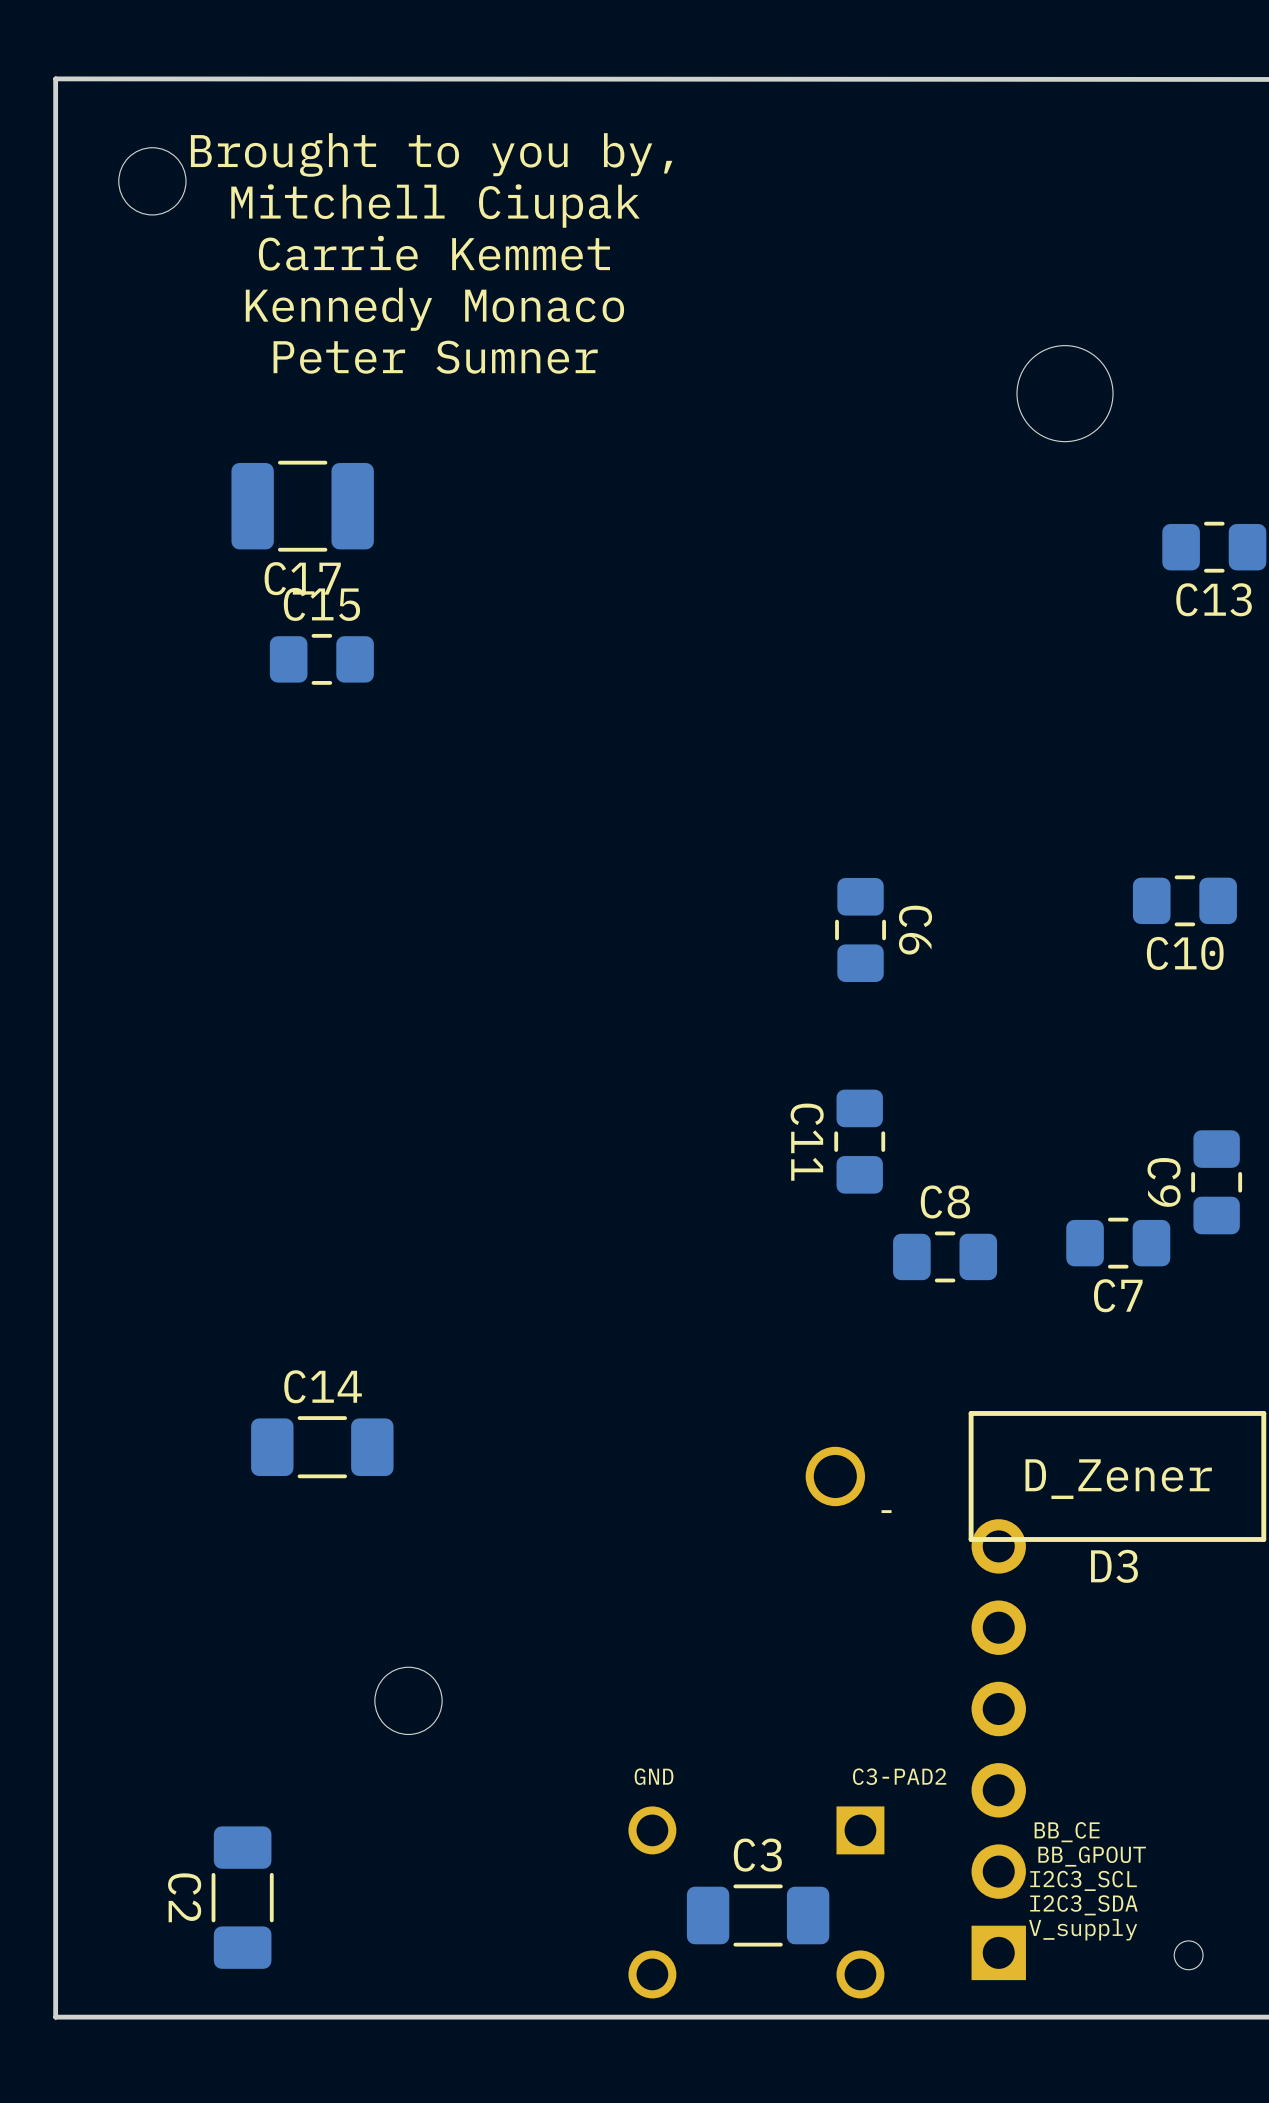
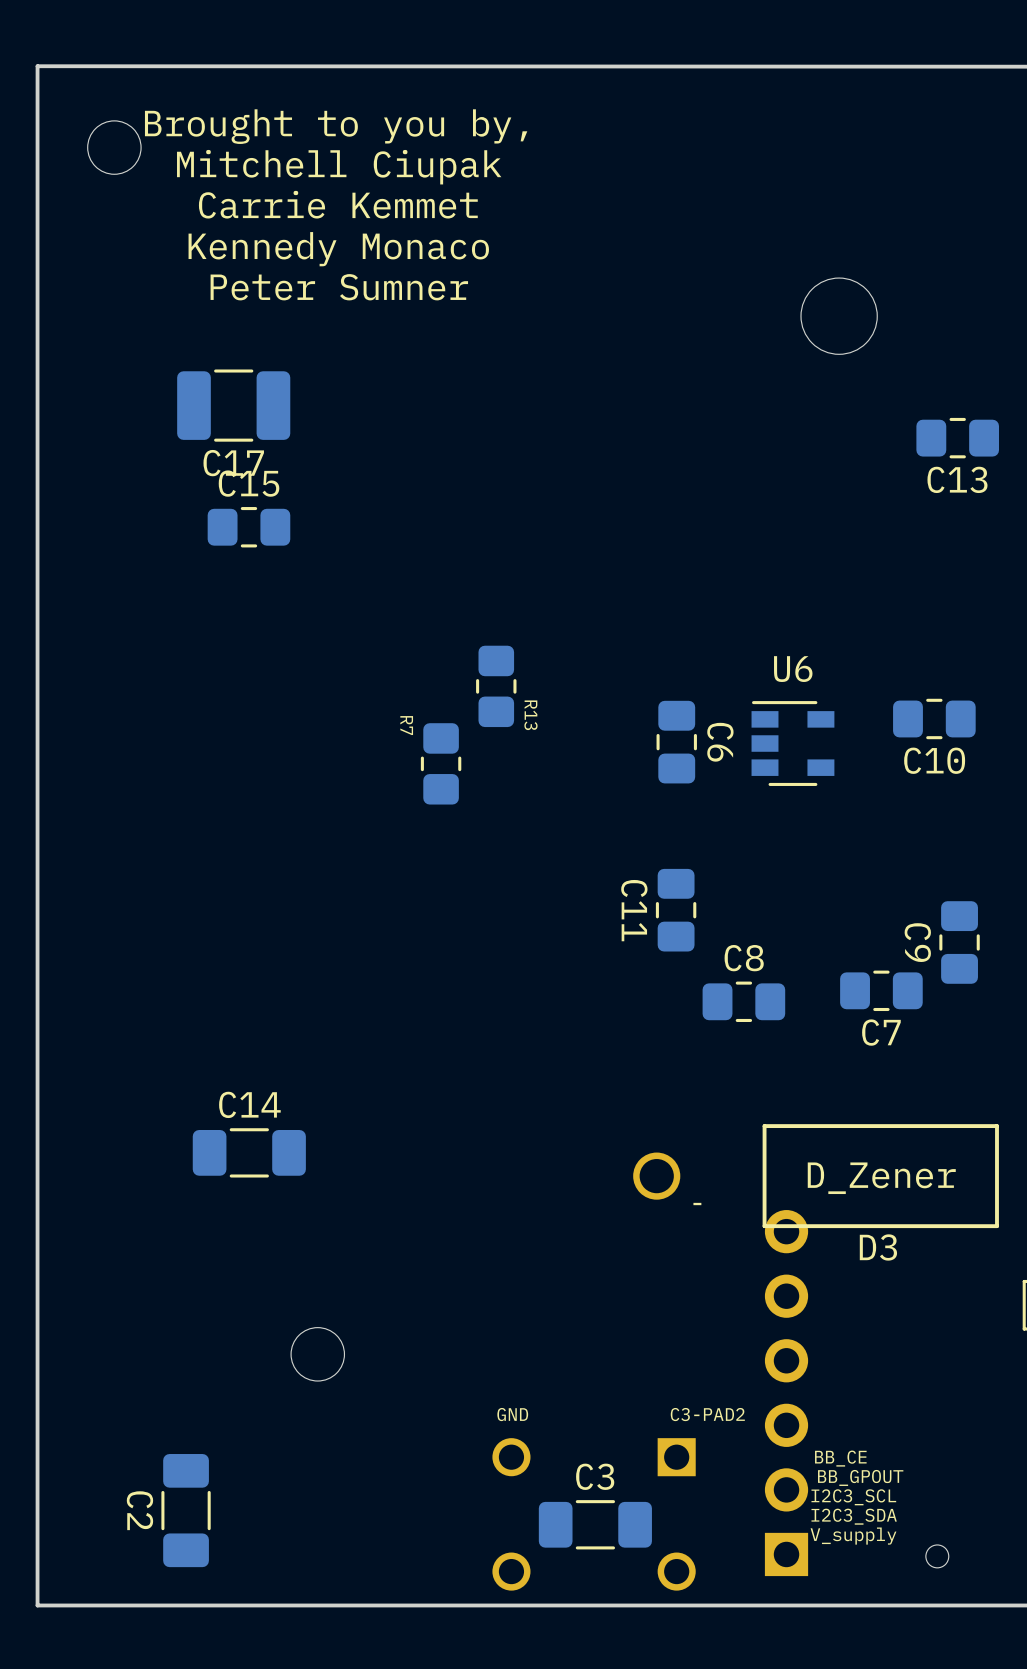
R13: none -> (496, 686)
U6: none -> (792, 743)
R7: none -> (441, 763)

